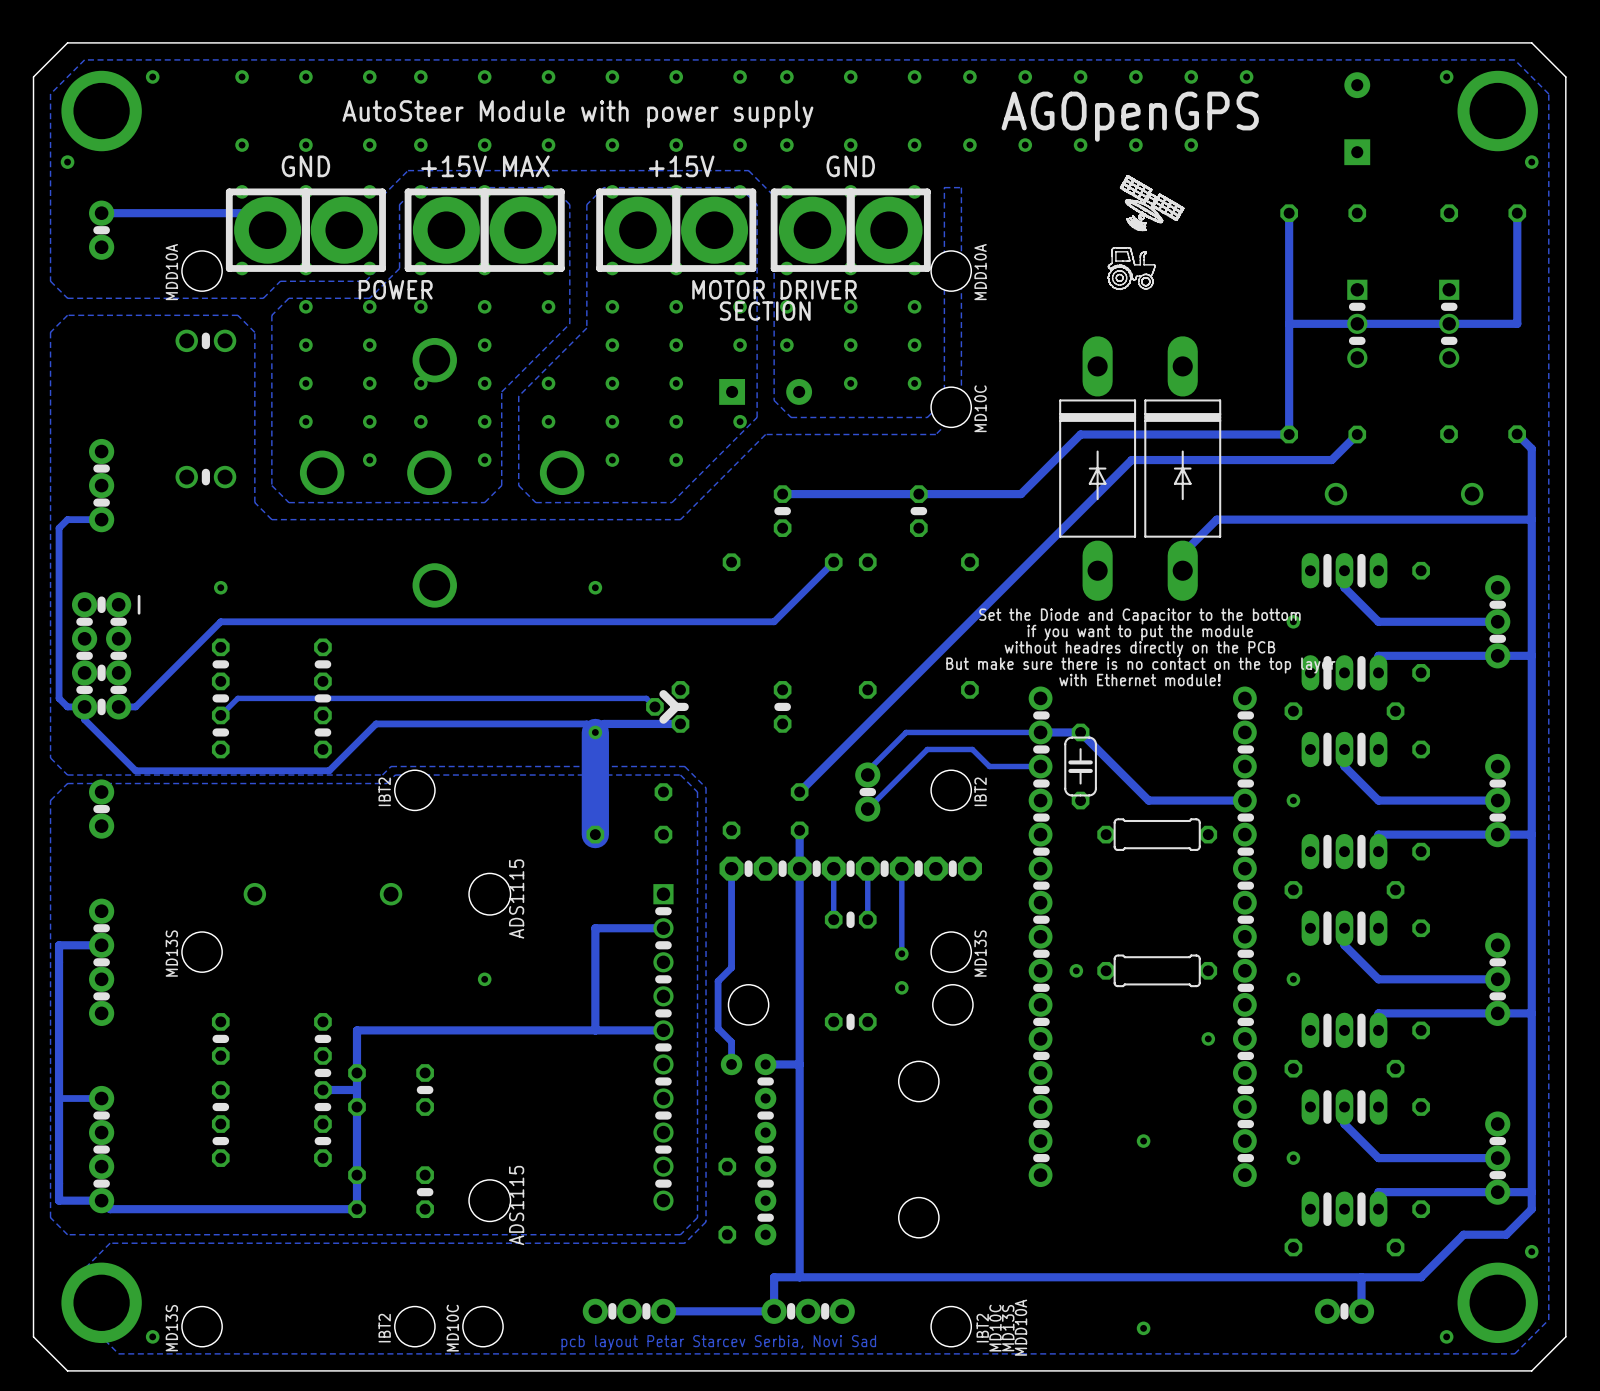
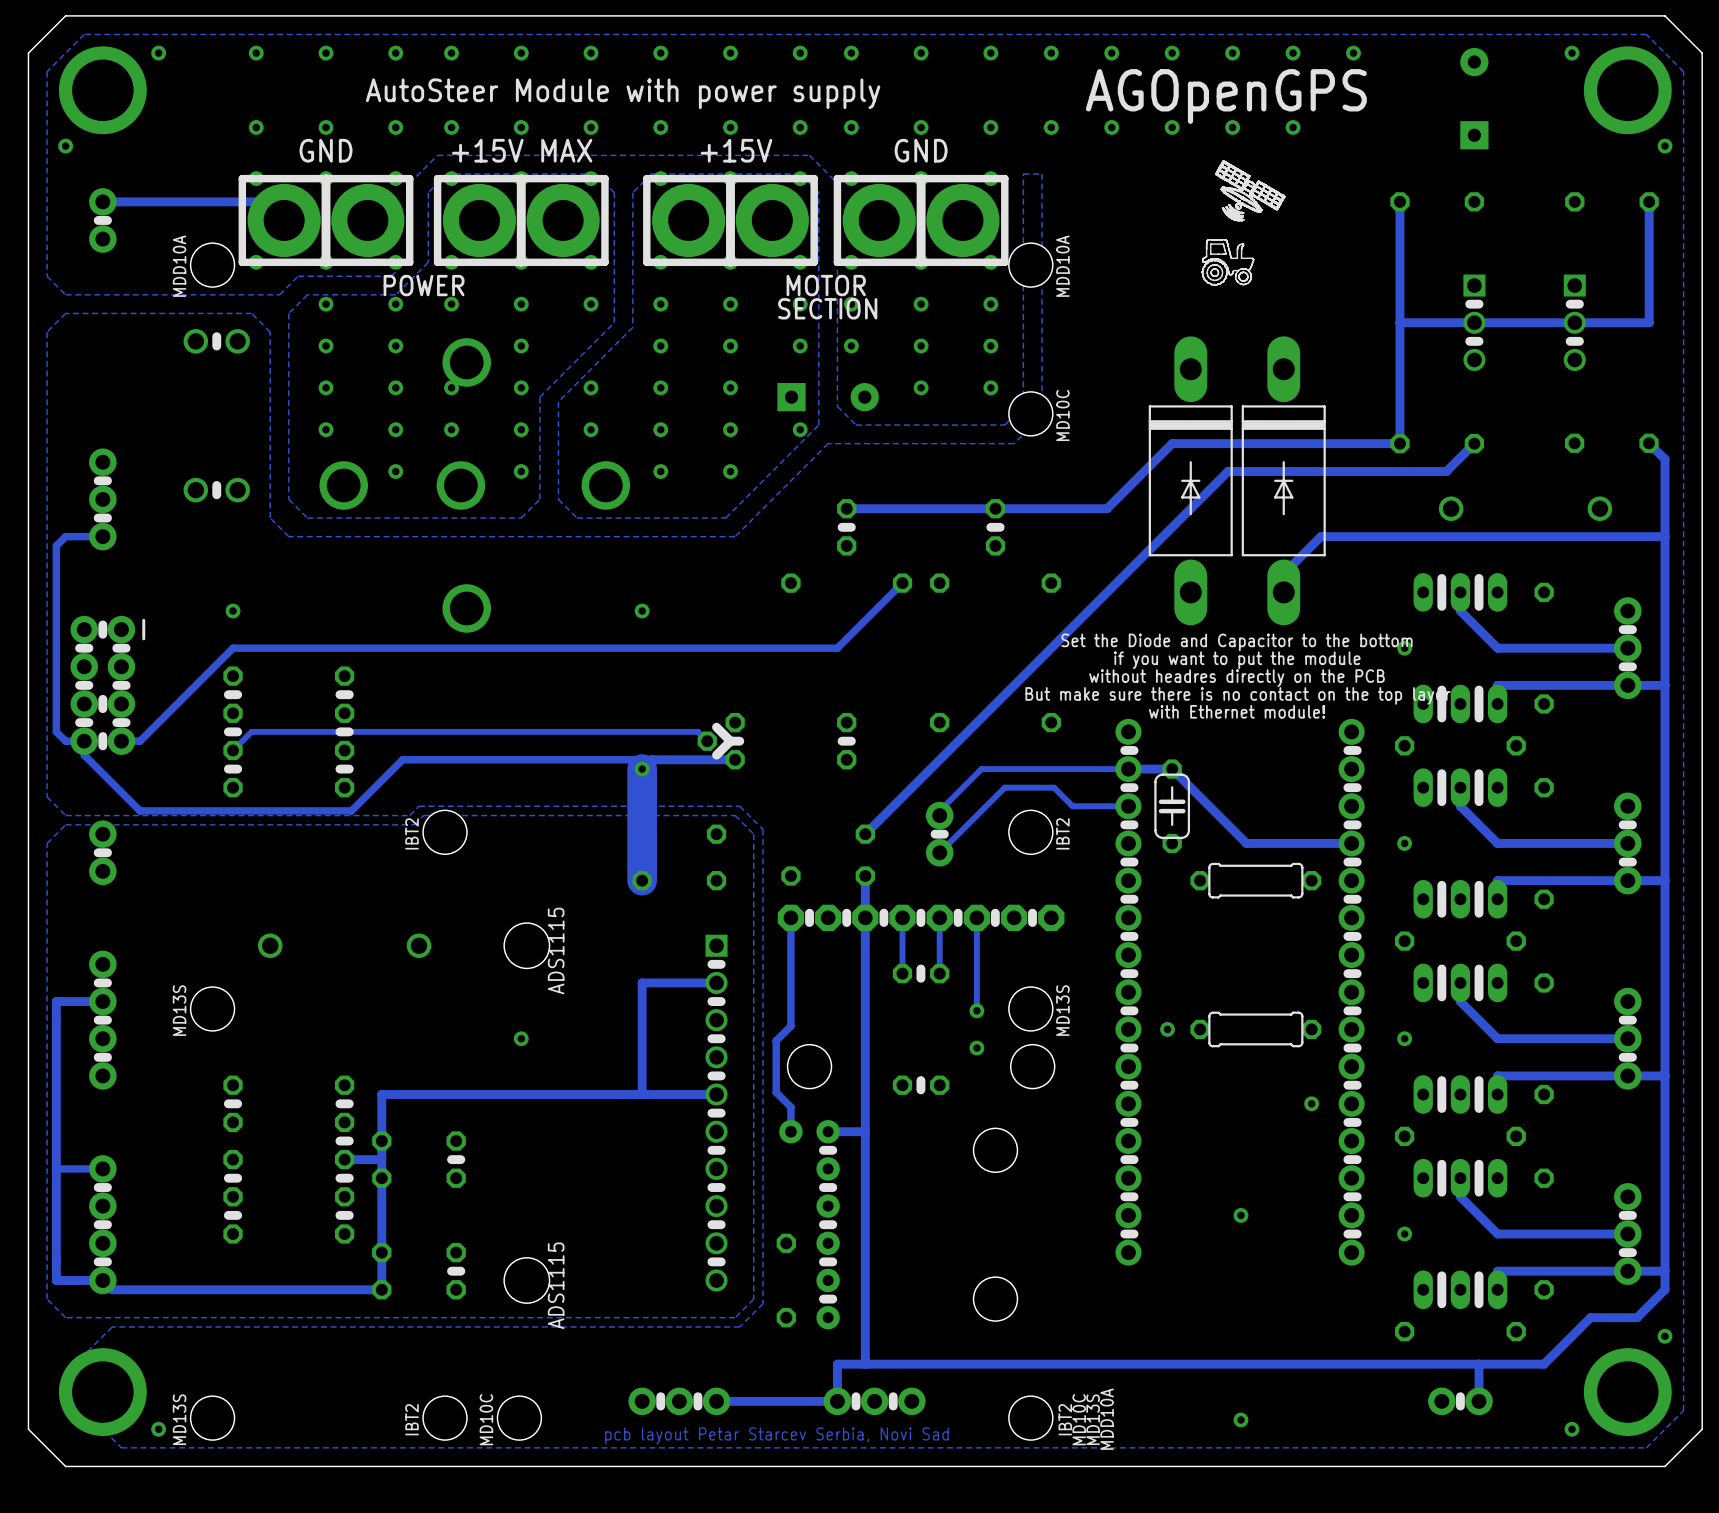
text: MOTOR DRIVER (774, 289) -> MOTOR (826, 285)

